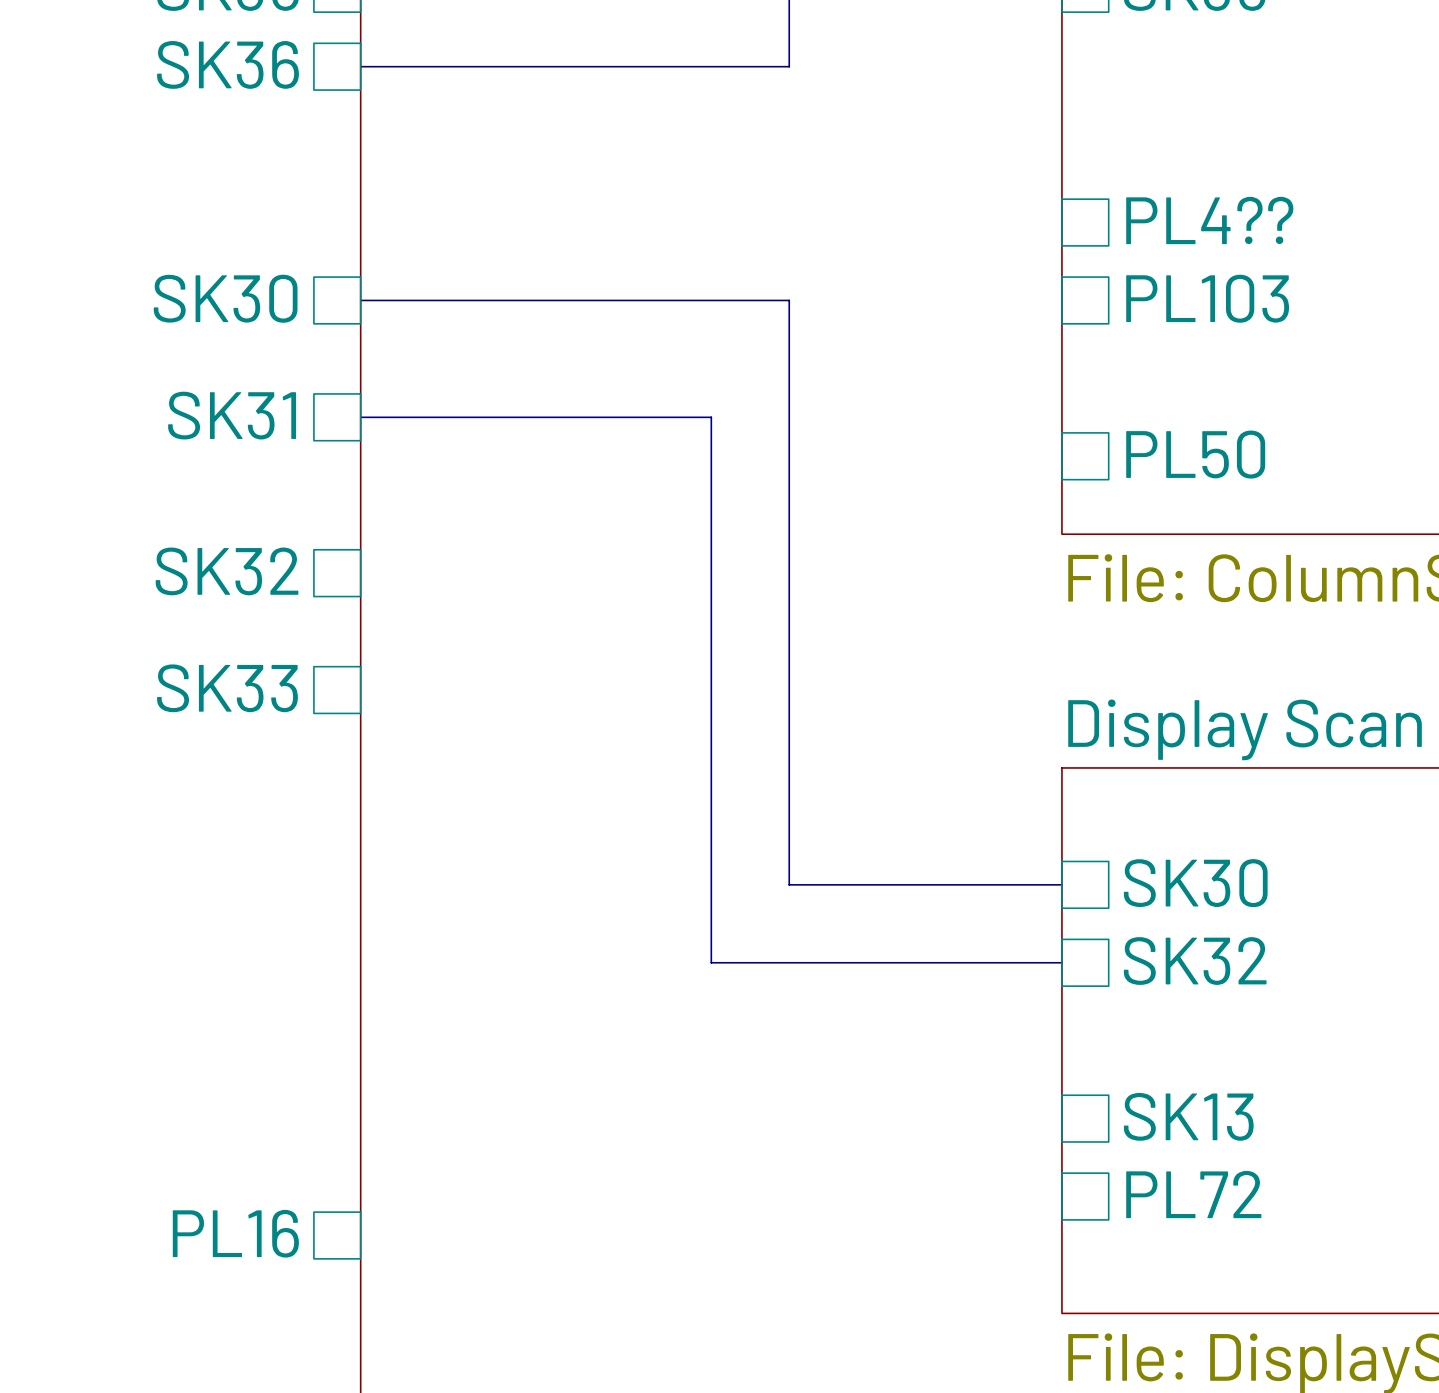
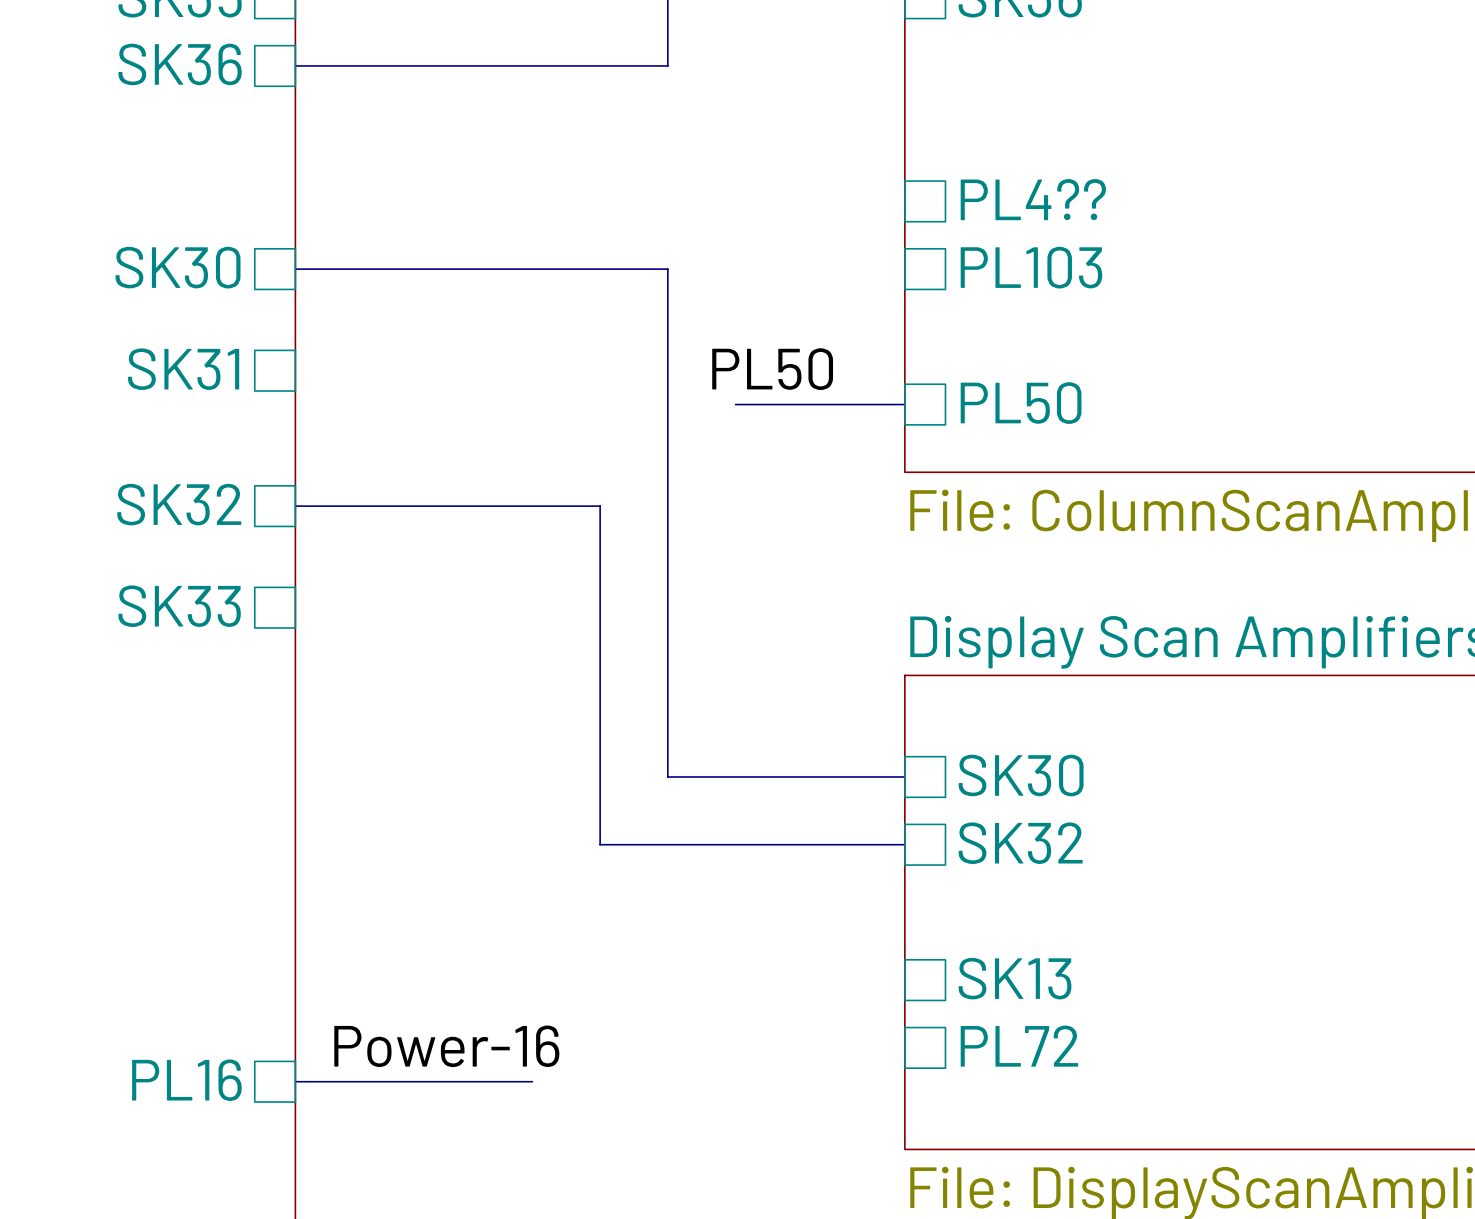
label: none -> PL50 (772, 369)
bus: (360, 417) (711, 417) (711, 573) -> (295, 506) (600, 506)
bus: none -> (735, 404) (904, 404)
label: none -> Power-16 (446, 1046)
bus: none -> (295, 1081) (532, 1081)

